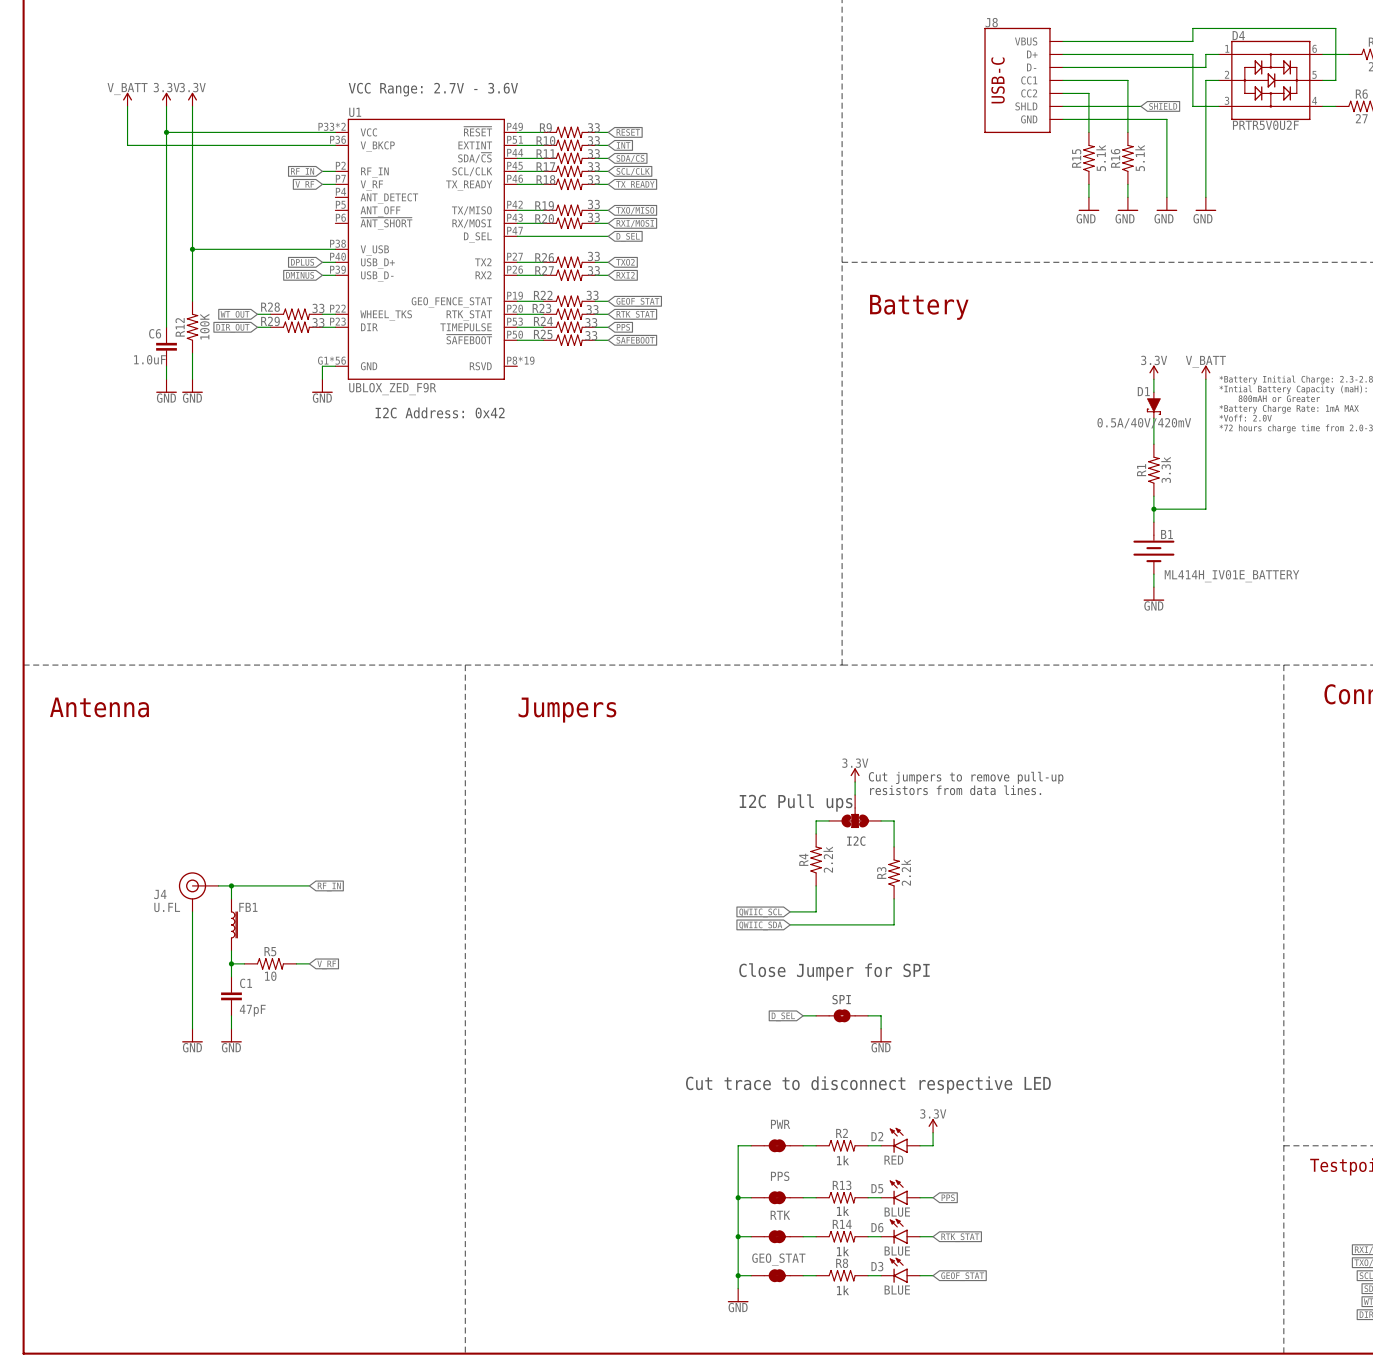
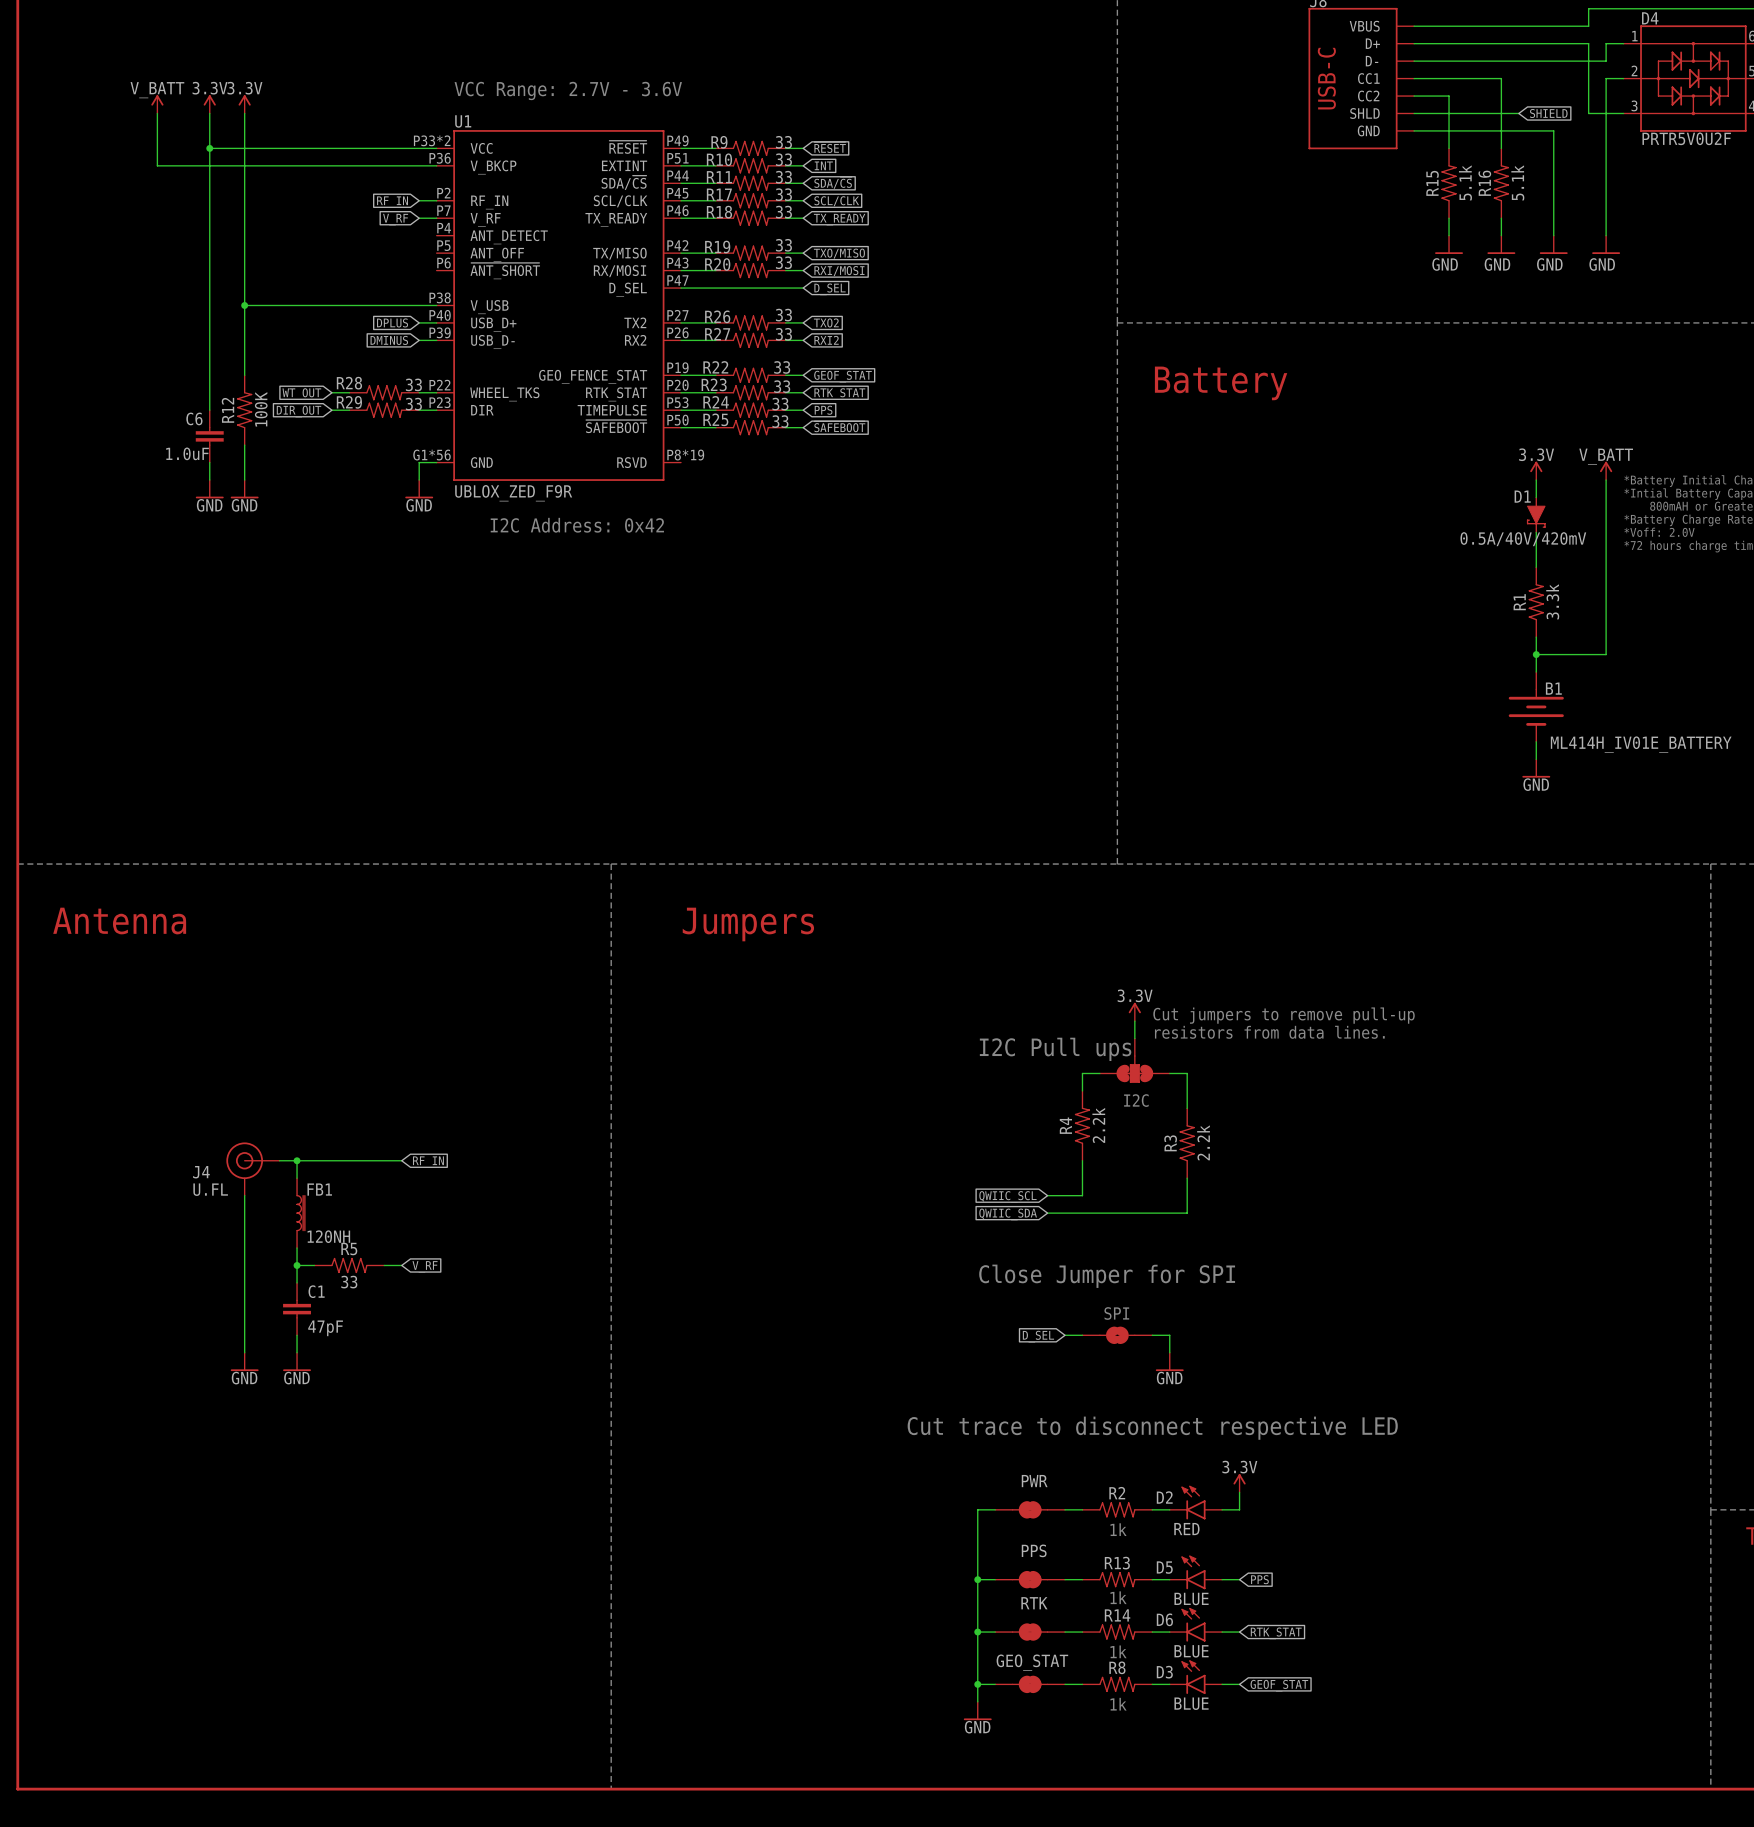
FB1 value: none -> 120NH (328, 1236)
R5 value: 10 (270, 976) -> 33 (349, 1282)

